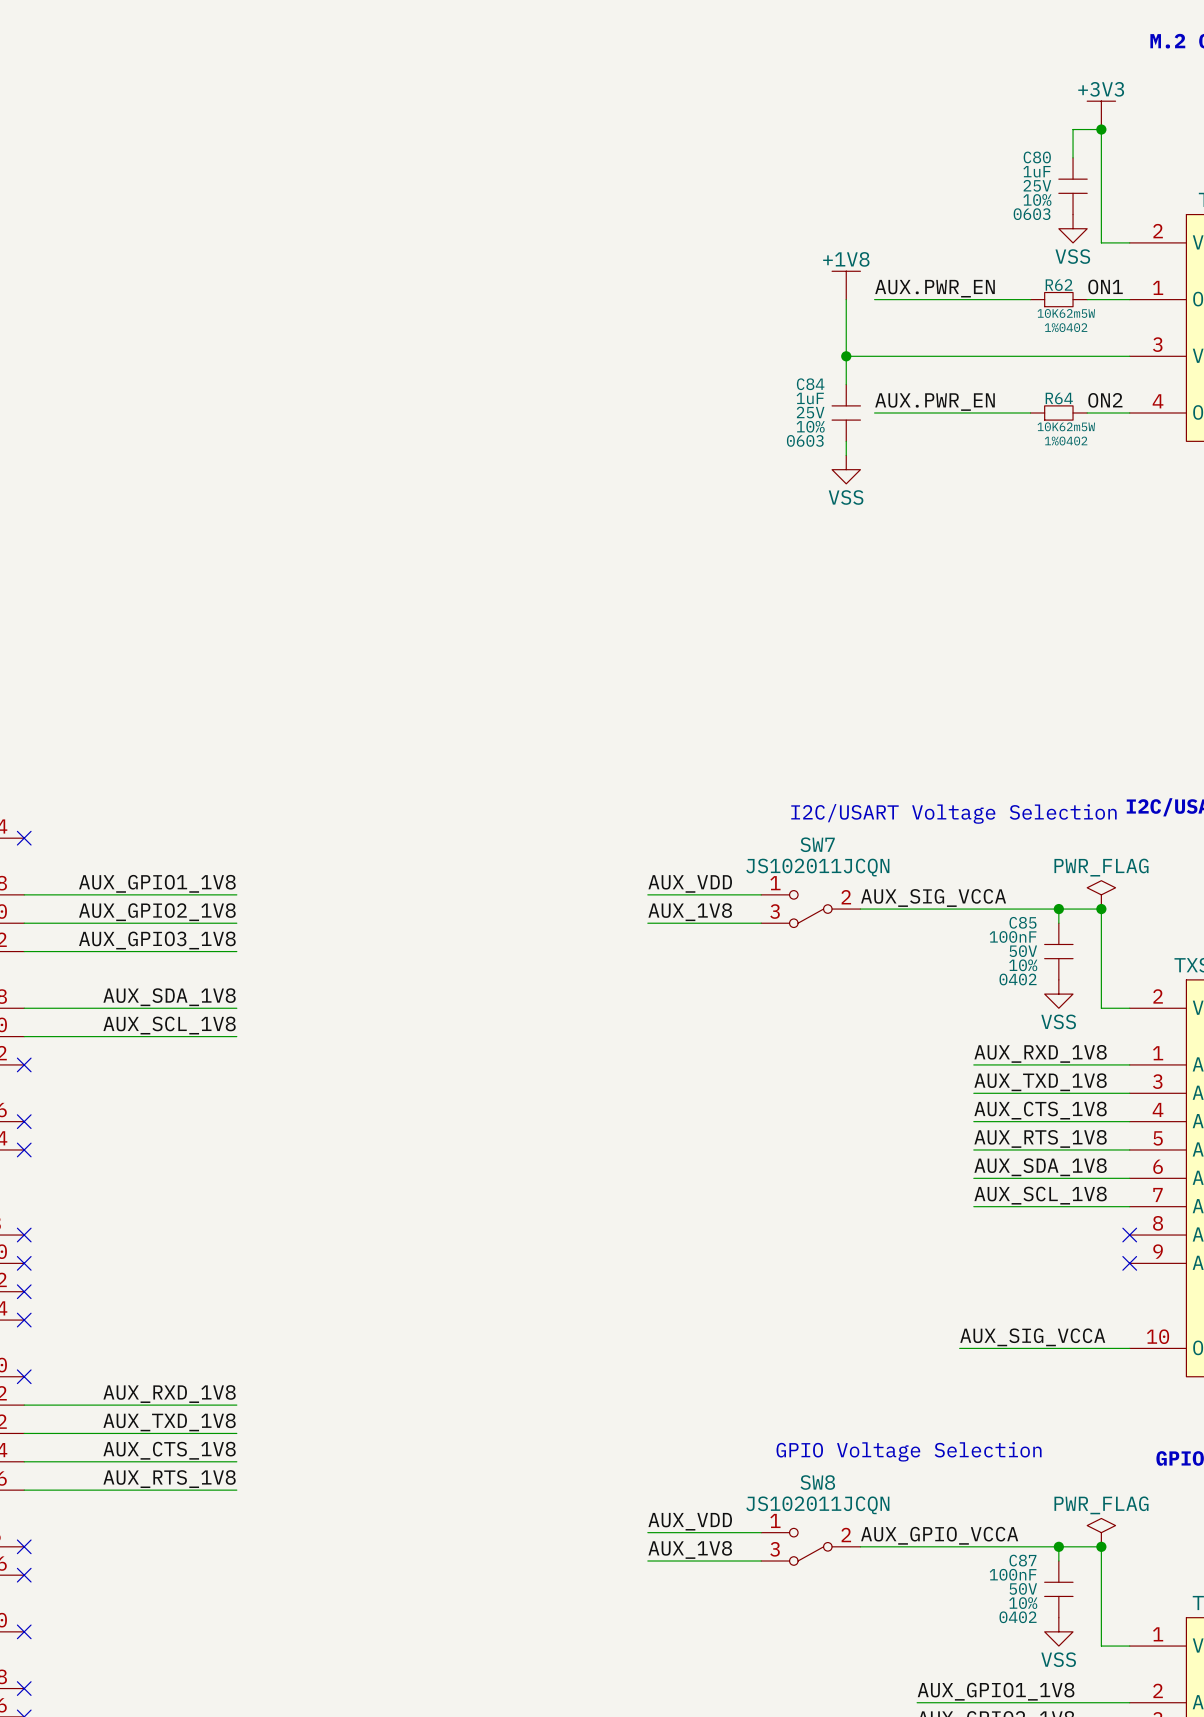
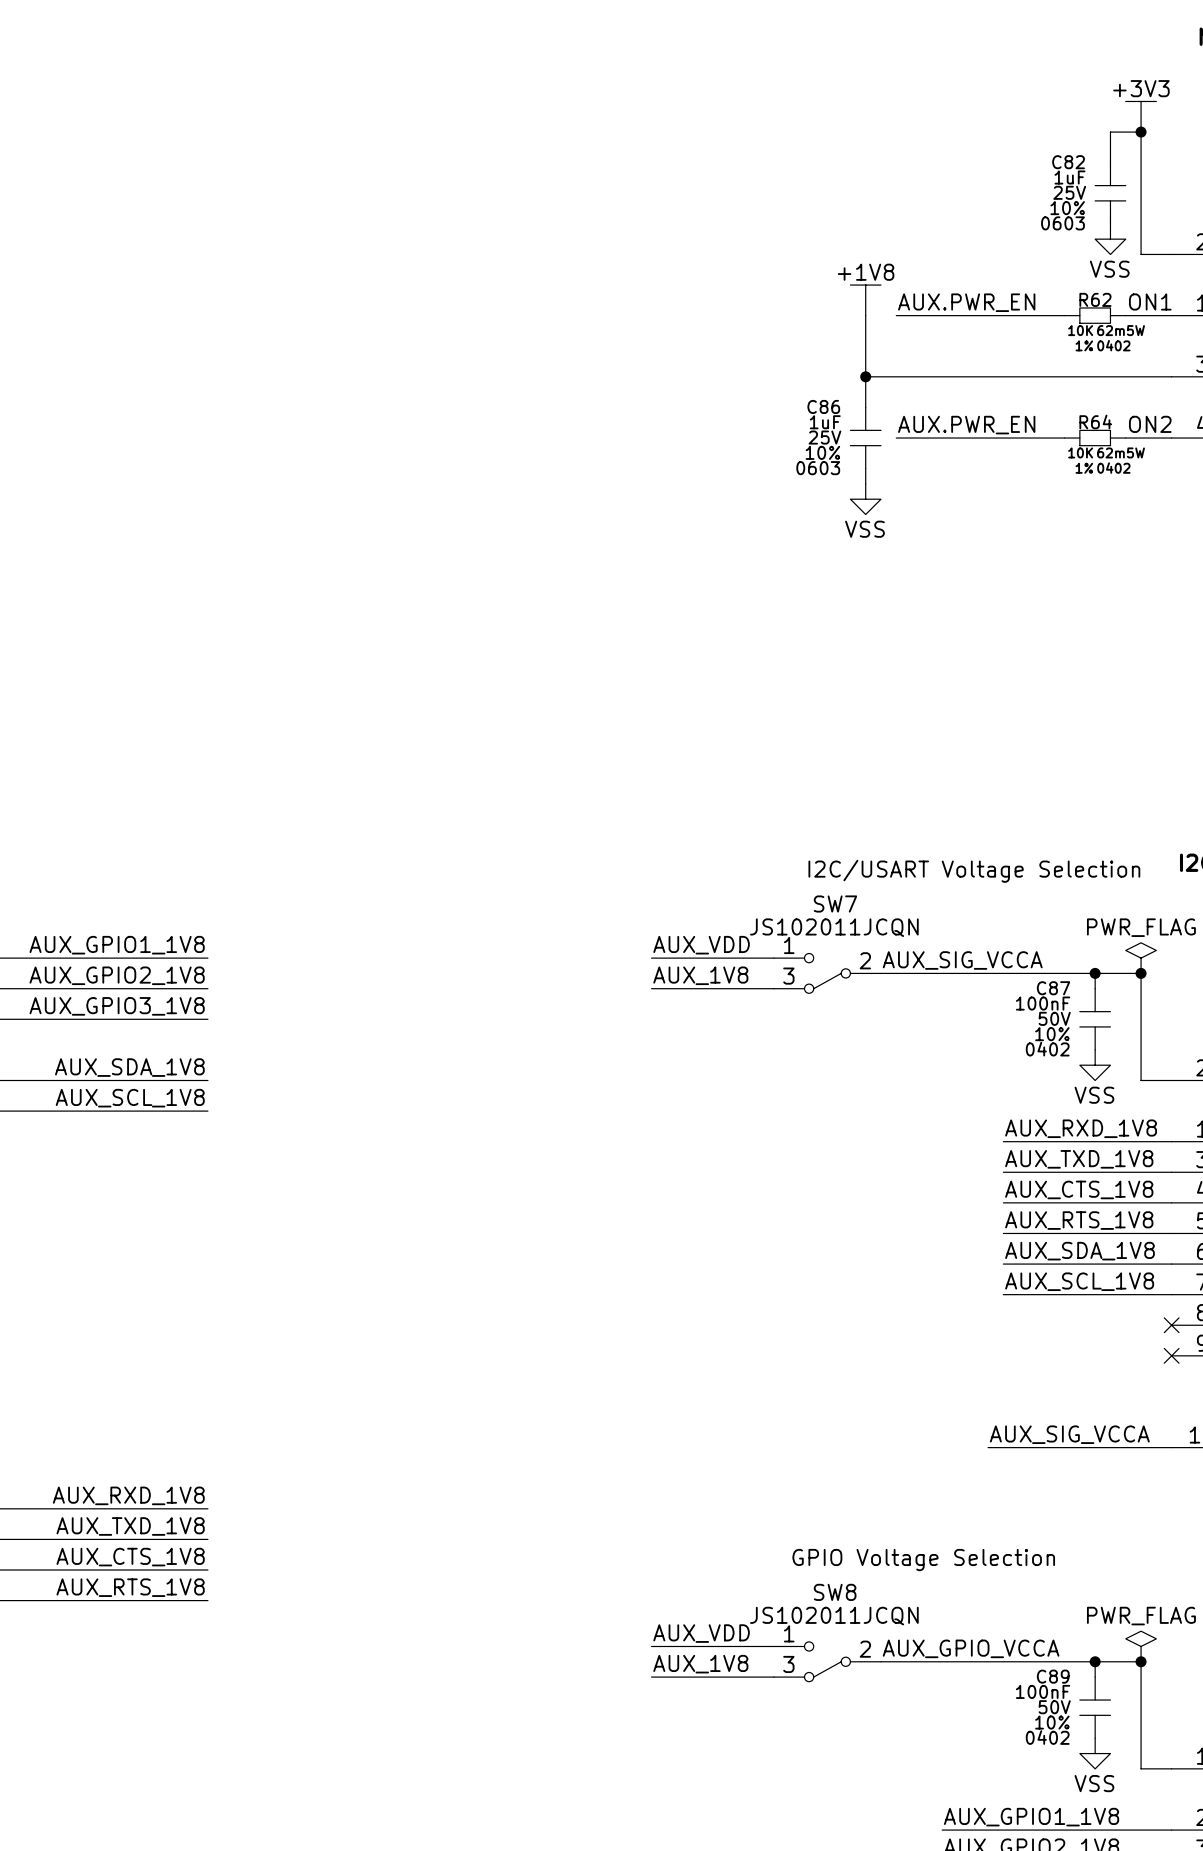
C80 name: C80 (1037, 157) -> C82 (1068, 162)
C84 name: C84 (810, 384) -> C86 (823, 406)
C85 name: C85 (1022, 922) -> C87 (1053, 988)
C87 name: C87 (1022, 1560) -> C89 (1053, 1676)

